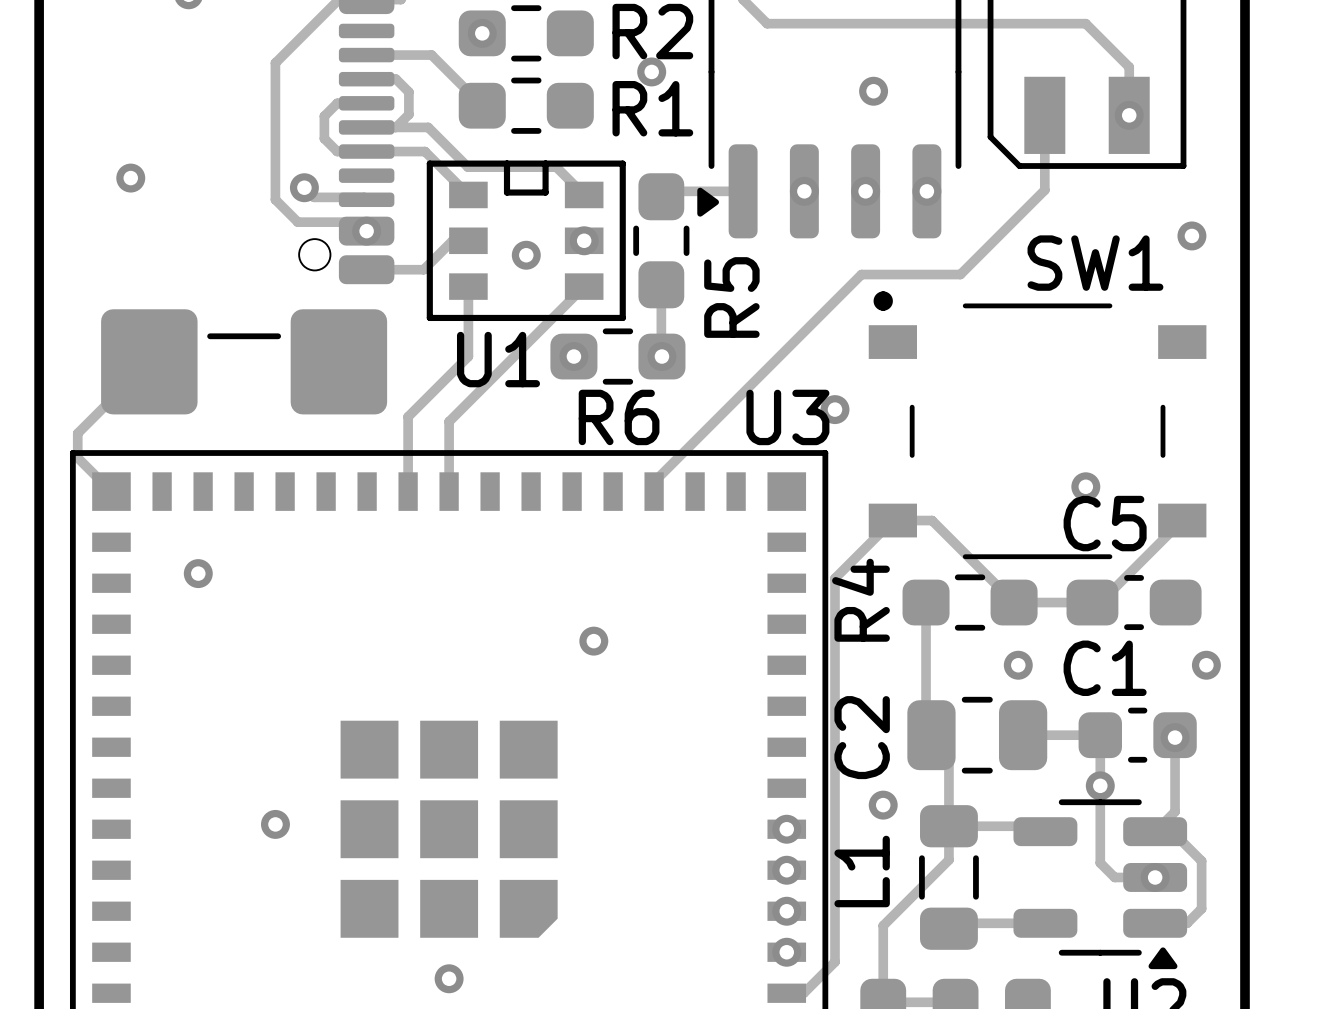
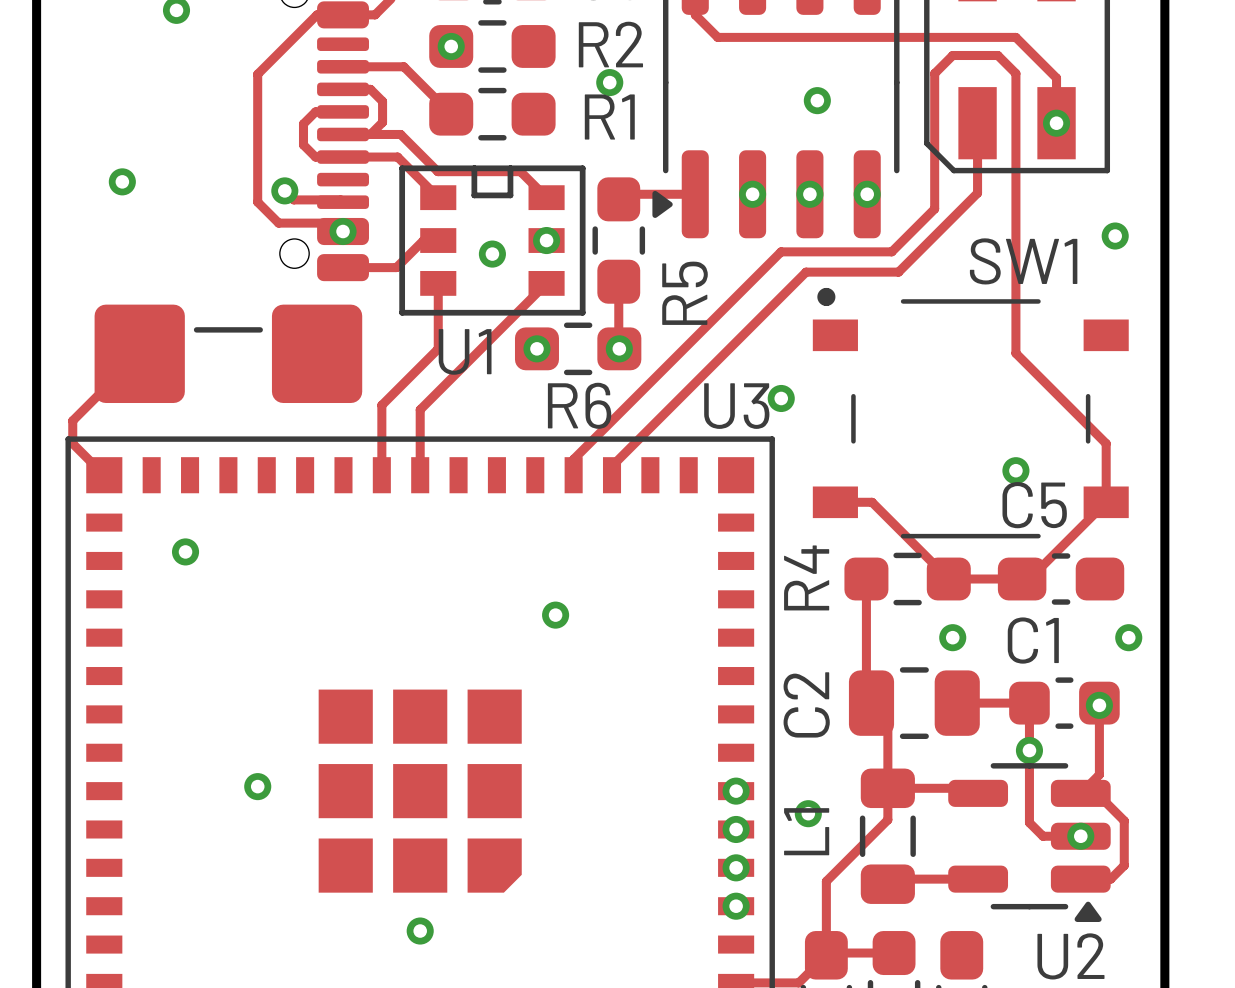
track: none -> (573, 475) (573, 459) (781, 251) (891, 251) (934, 208) (934, 73) (952, 55) (997, 55) (1015, 73) (1015, 353) (1106, 443) (1106, 502)
track: (892, 520) (834, 578) (834, 961) (803, 993) (786, 993) -> none
via position: (883, 805) -> (808, 813)

